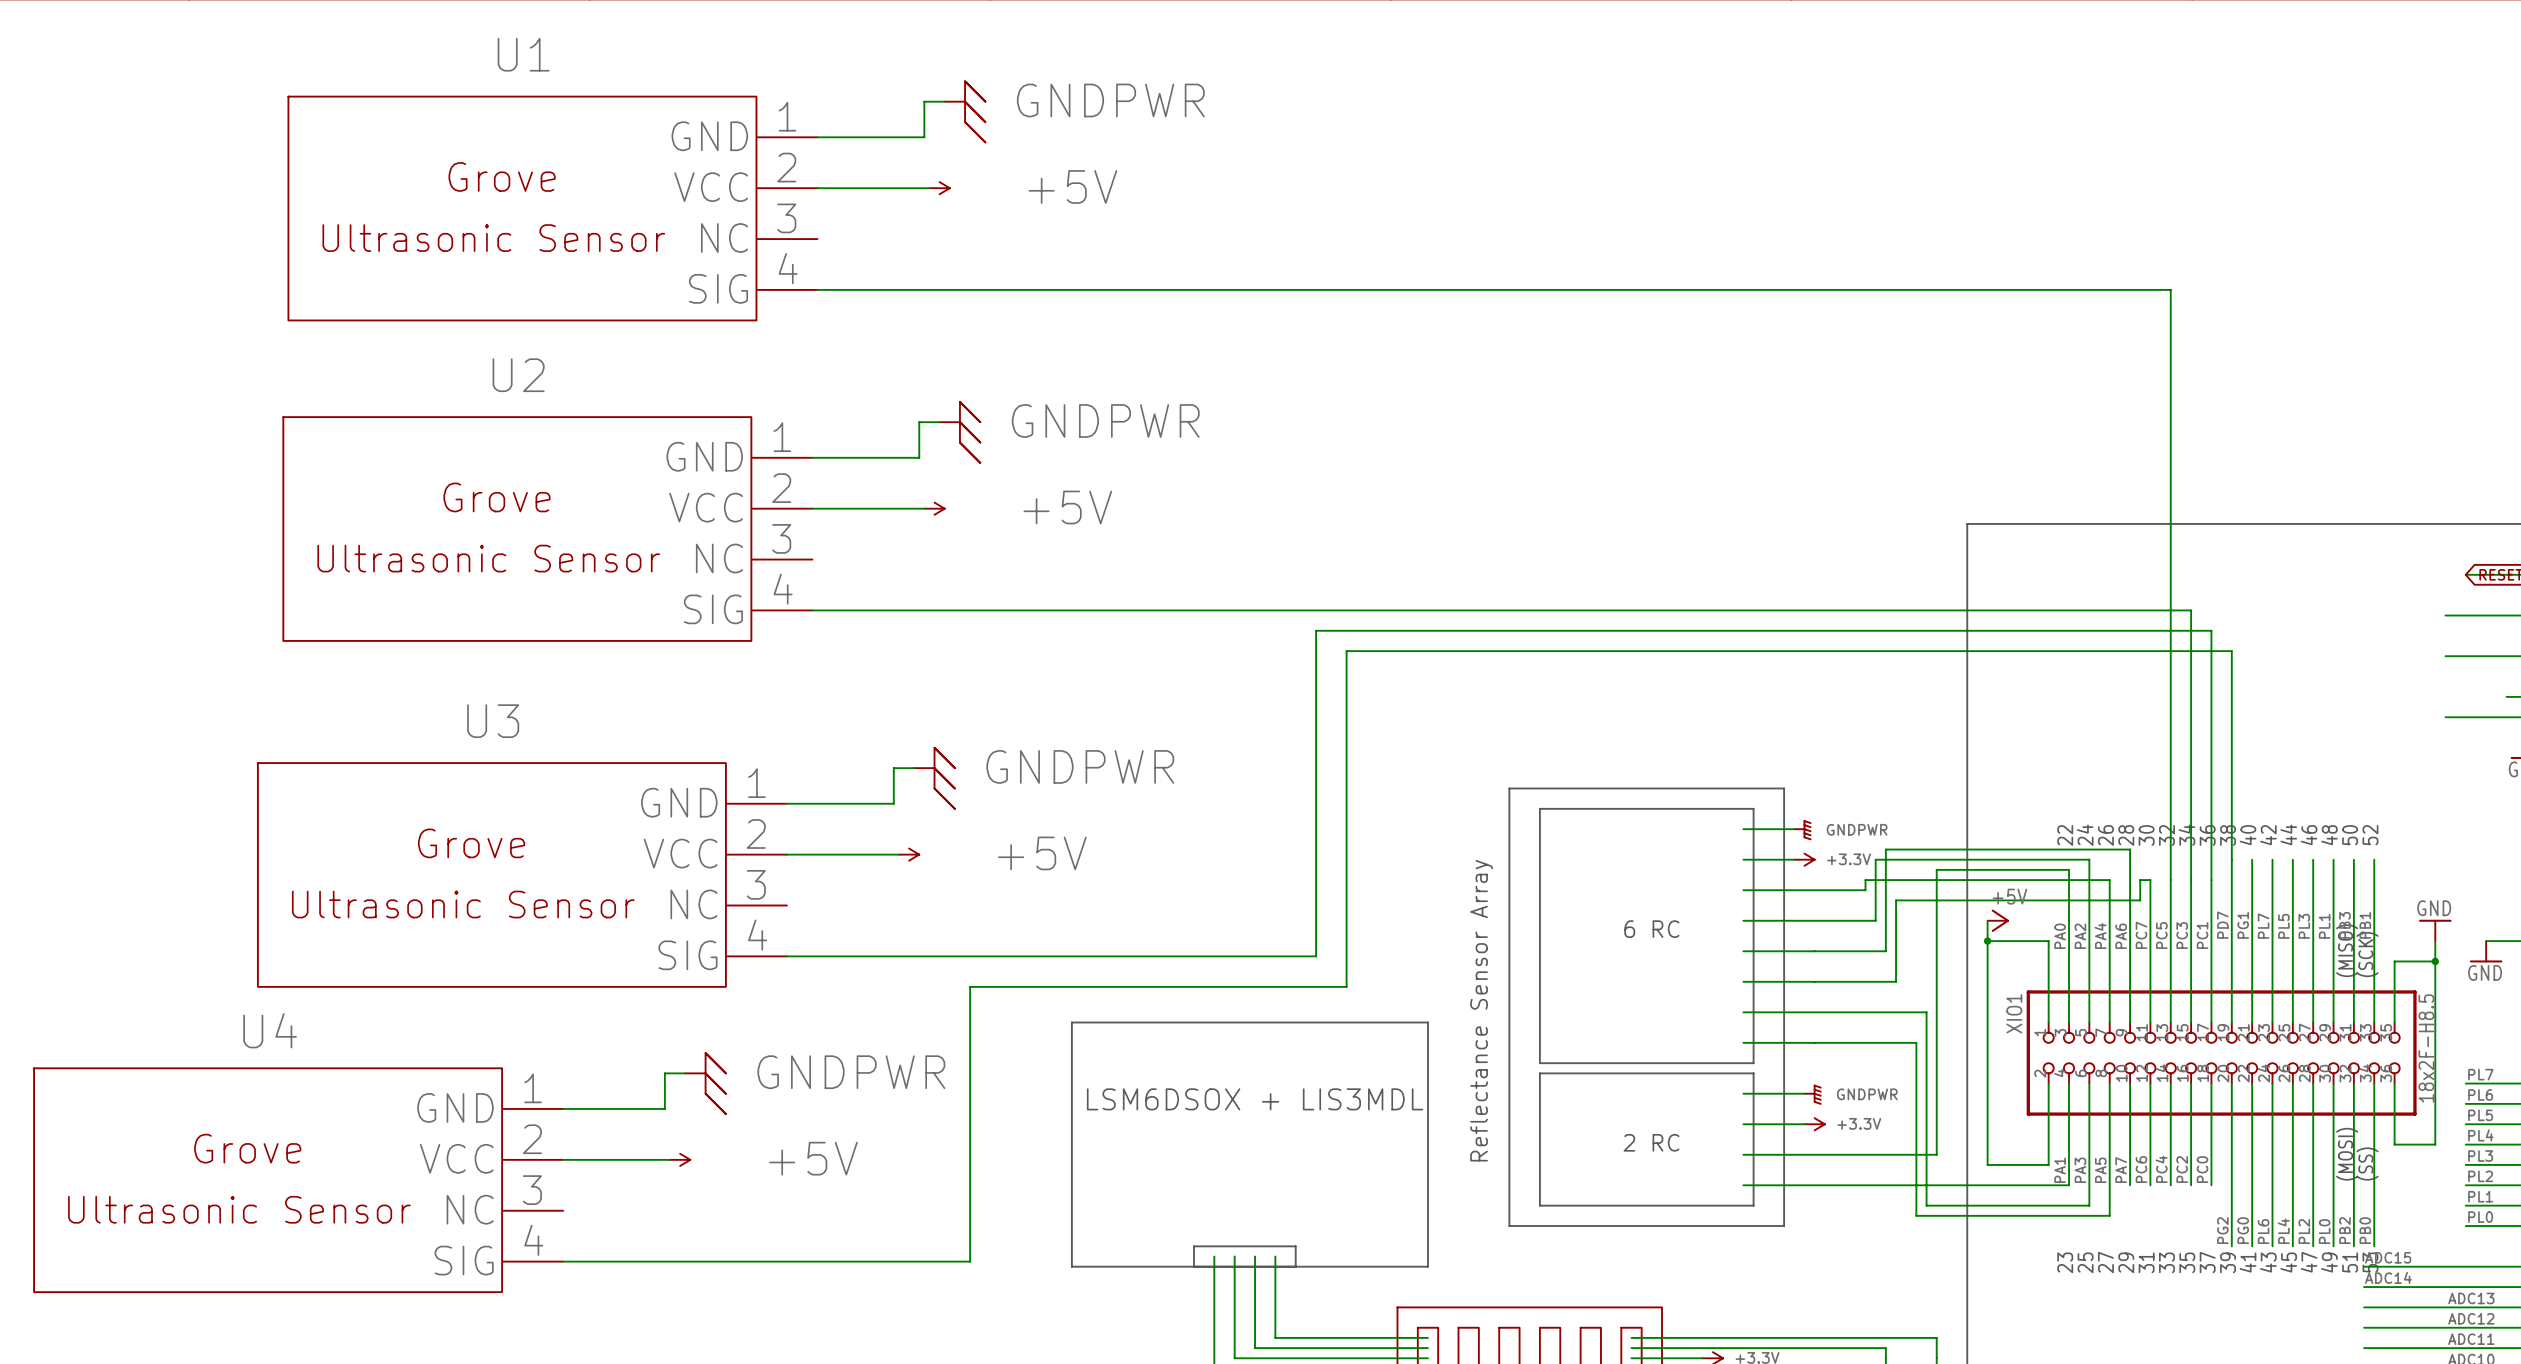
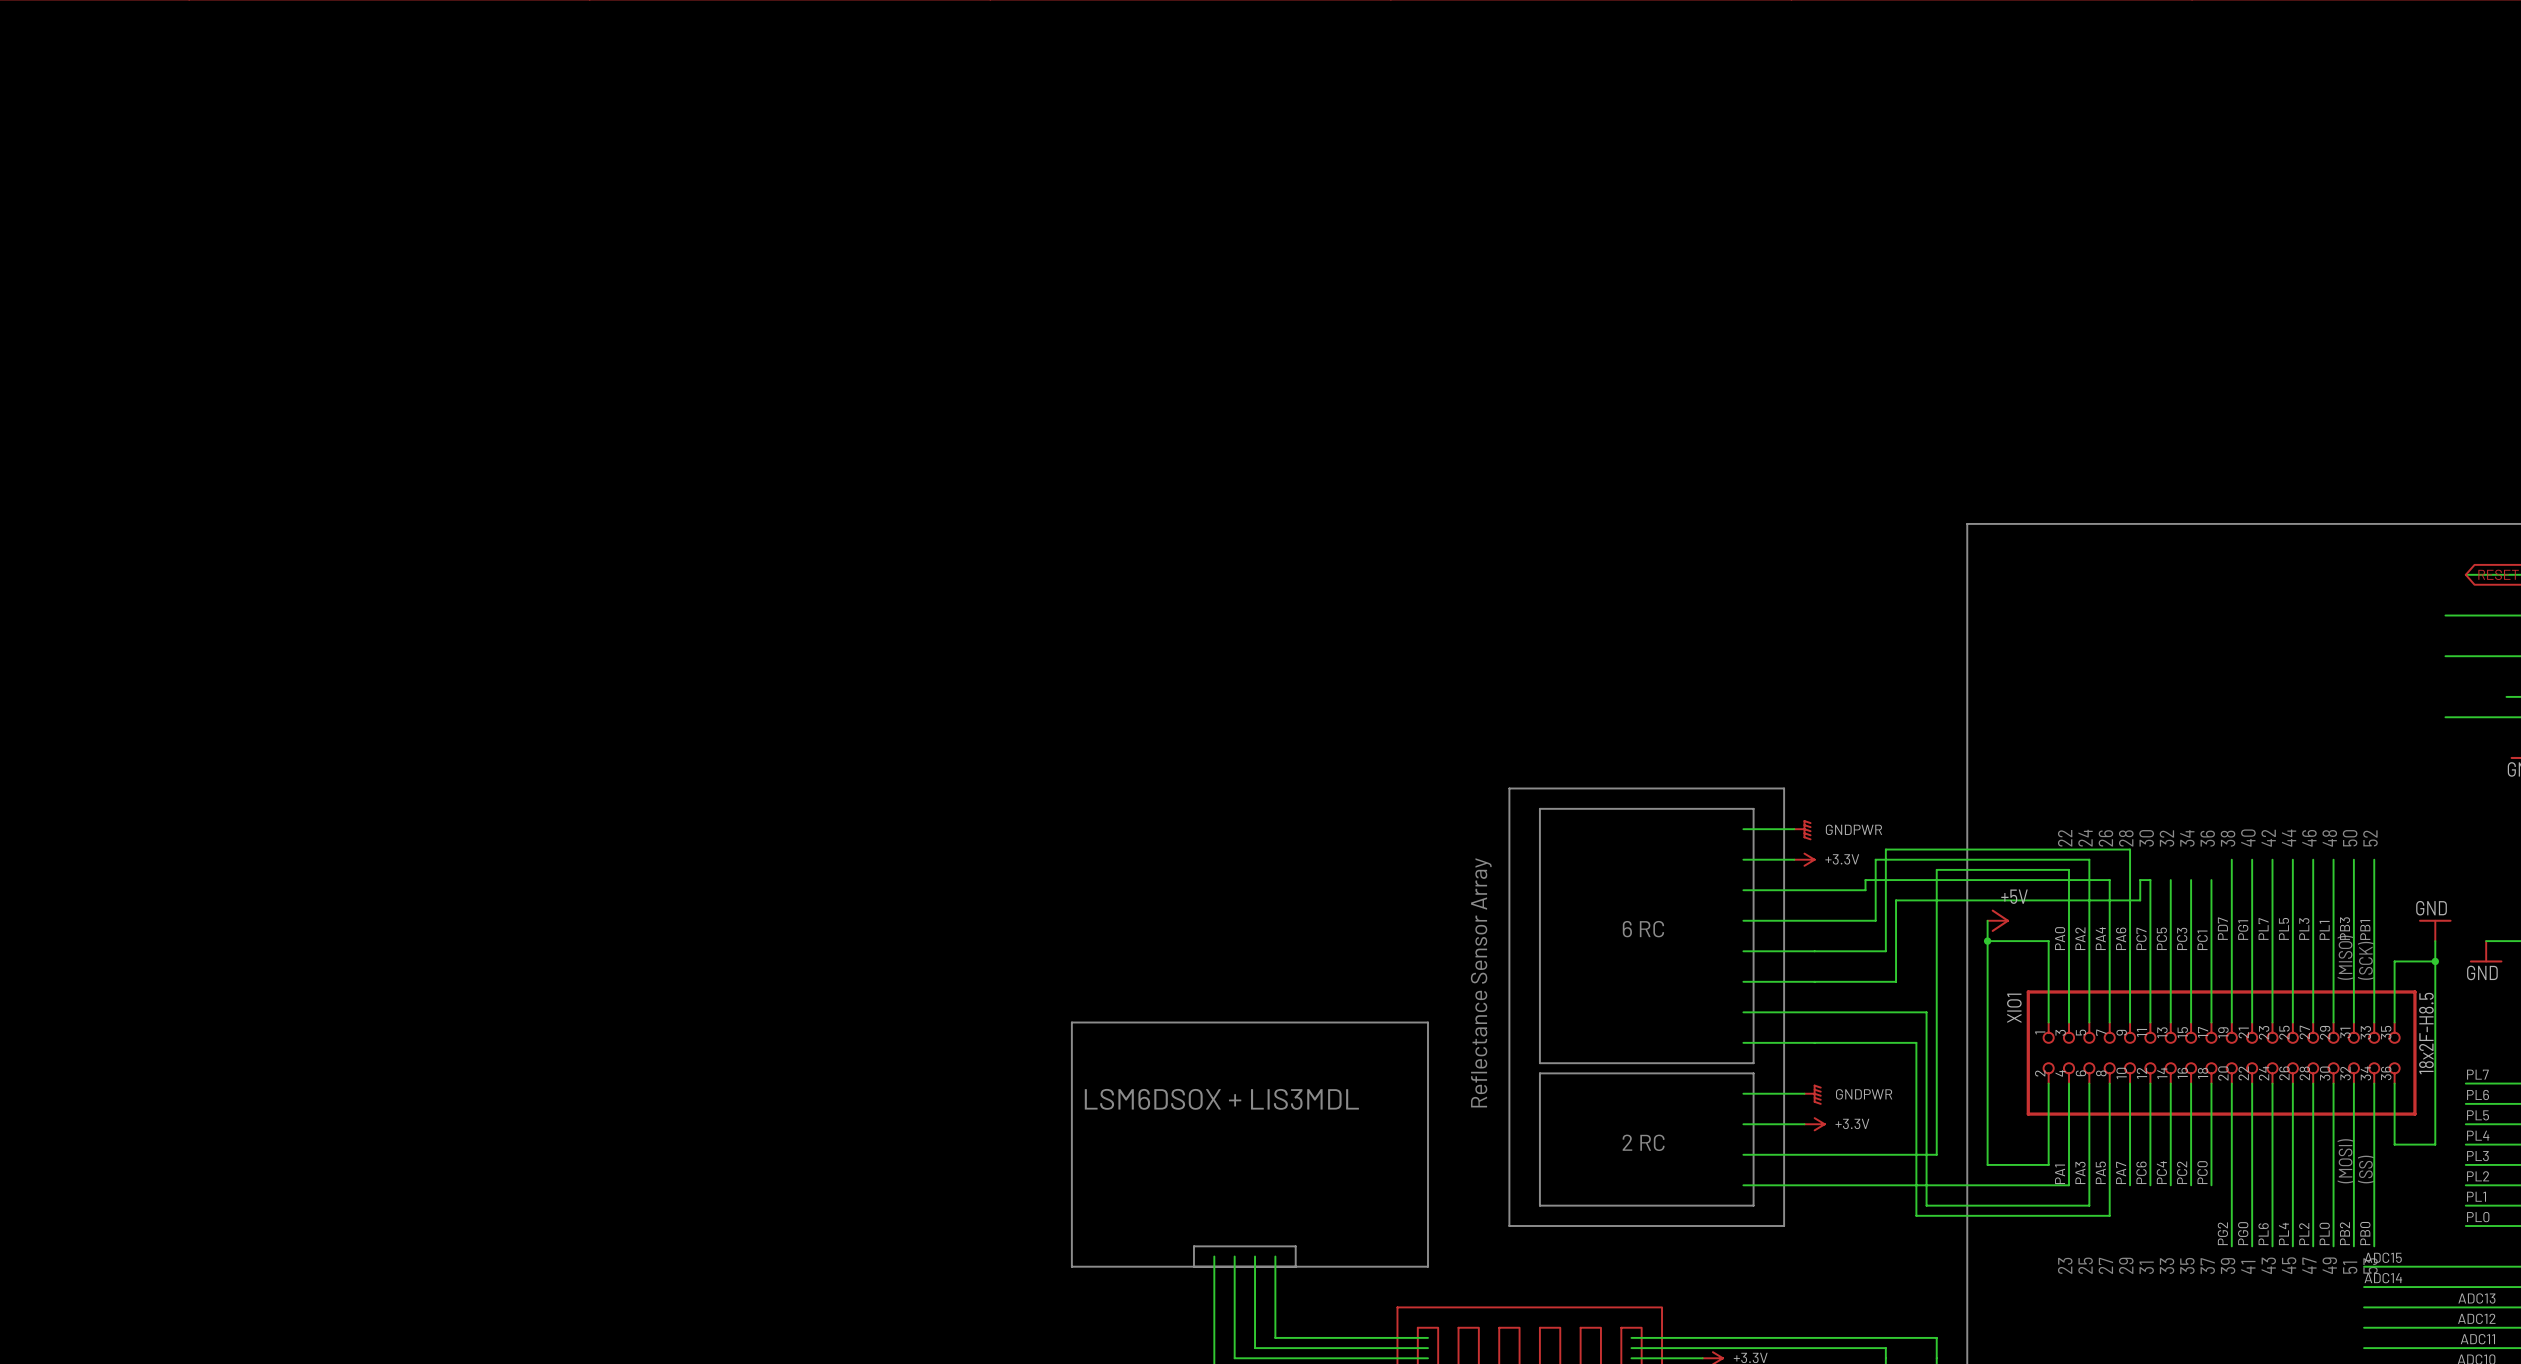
wire: (944, 101) (924, 101) (924, 137) (817, 137) -> none
power symbol: GNDPWR (965, 111) -> none
wire: (817, 188) (929, 188) -> none
power symbol: +5V (939, 188) -> none
U1: (552, 208) -> none
wire: (817, 289) (2170, 289) (2170, 880) -> none
wire: (939, 422) (919, 422) (919, 457) (812, 457) -> none
power symbol: GNDPWR (959, 432) -> none
wire: (812, 508) (924, 508) -> none
power symbol: +5V (934, 508) -> none
U2: (547, 529) -> none
wire: (812, 610) (2191, 610) (2191, 880) -> none
wire: (914, 768) (893, 768) (893, 803) (786, 803) -> none
power symbol: GNDPWR (934, 778) -> none
wire: (786, 854) (898, 854) -> none
power symbol: +5V (909, 854) -> none
wire: (2231, 859) (2231, 651) (1346, 651) (1346, 986) (970, 986) (970, 1261) (563, 1261) -> none
U3: (522, 874) -> none
wire: (2211, 880) (2211, 630) (1316, 630) (1316, 956) (786, 956) -> none
wire: (685, 1073) (664, 1073) (664, 1108) (563, 1108) -> none
power symbol: GNDPWR (705, 1083) -> none
wire: (563, 1159) (669, 1159) -> none
power symbol: +5V (680, 1159) -> none
U4: (298, 1180) -> none

